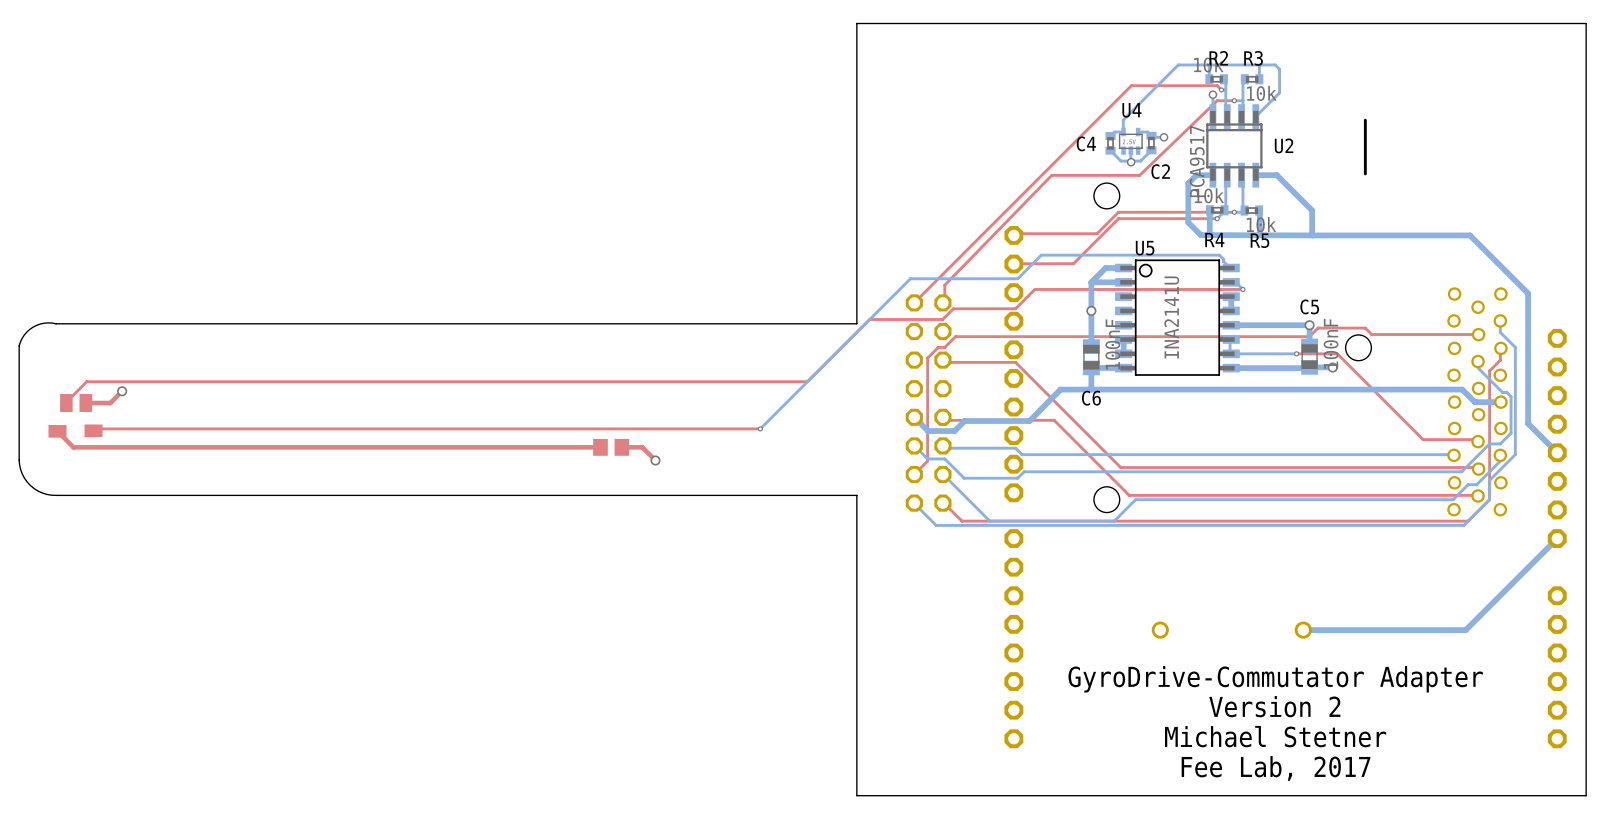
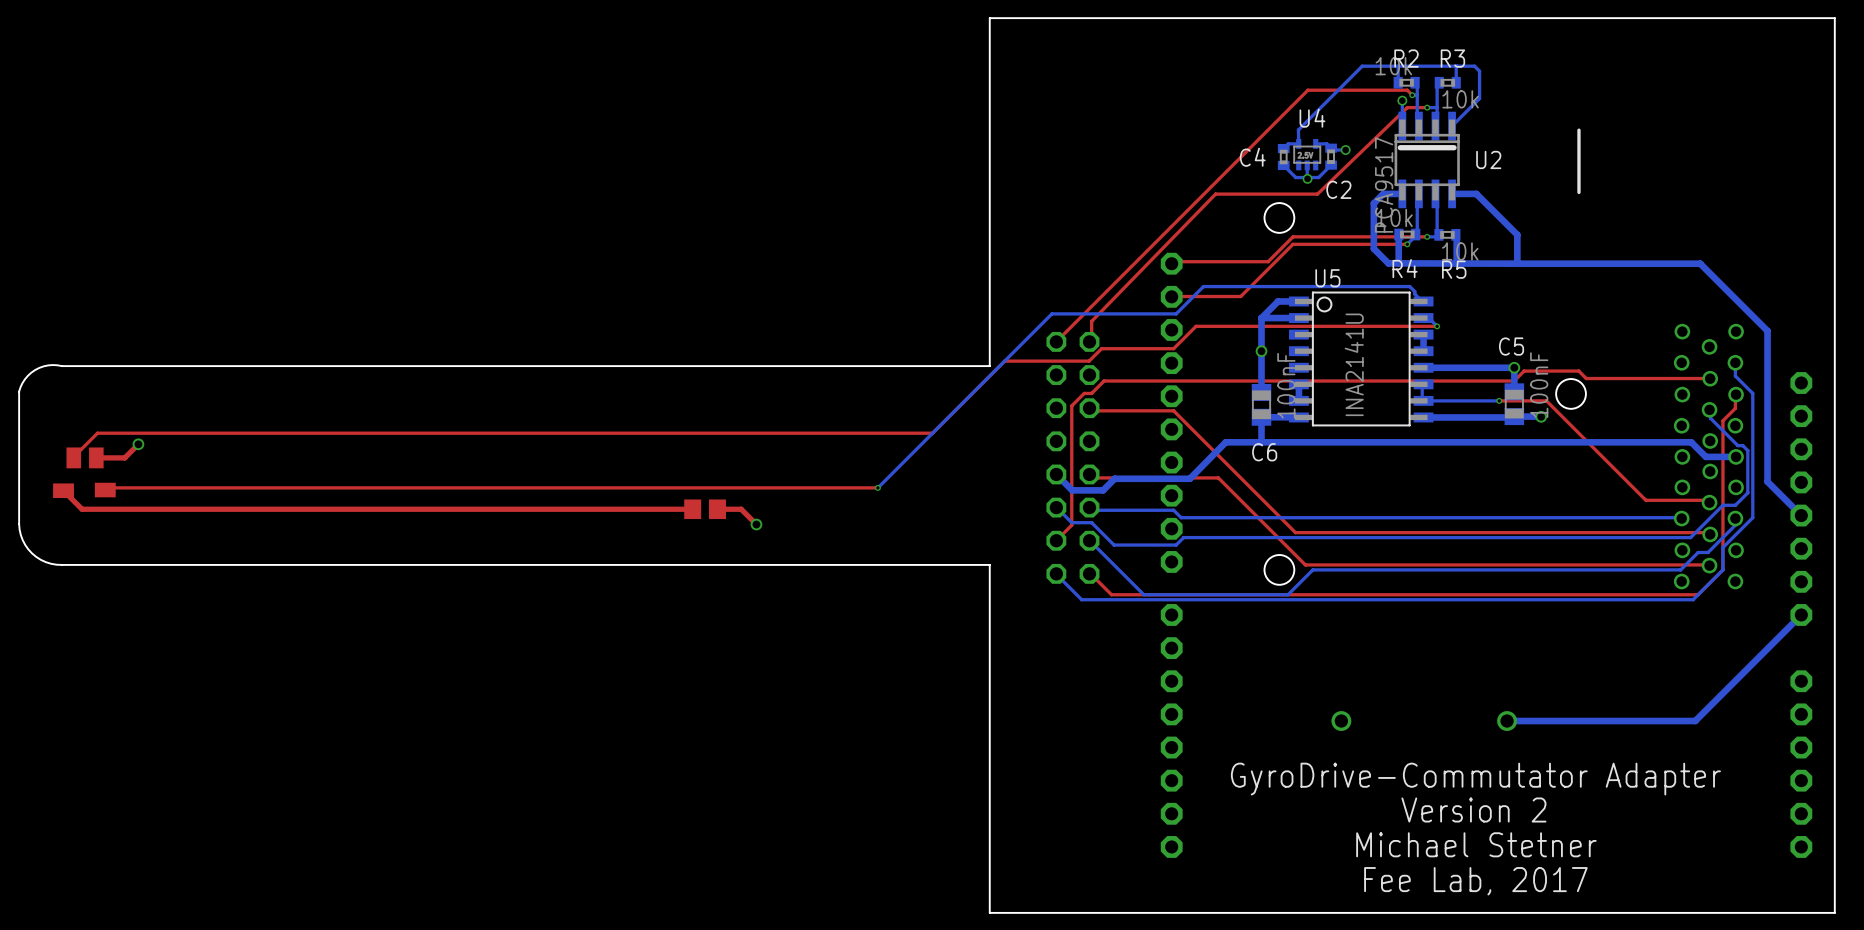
line: none -> (1454, 147) (1400, 147)

